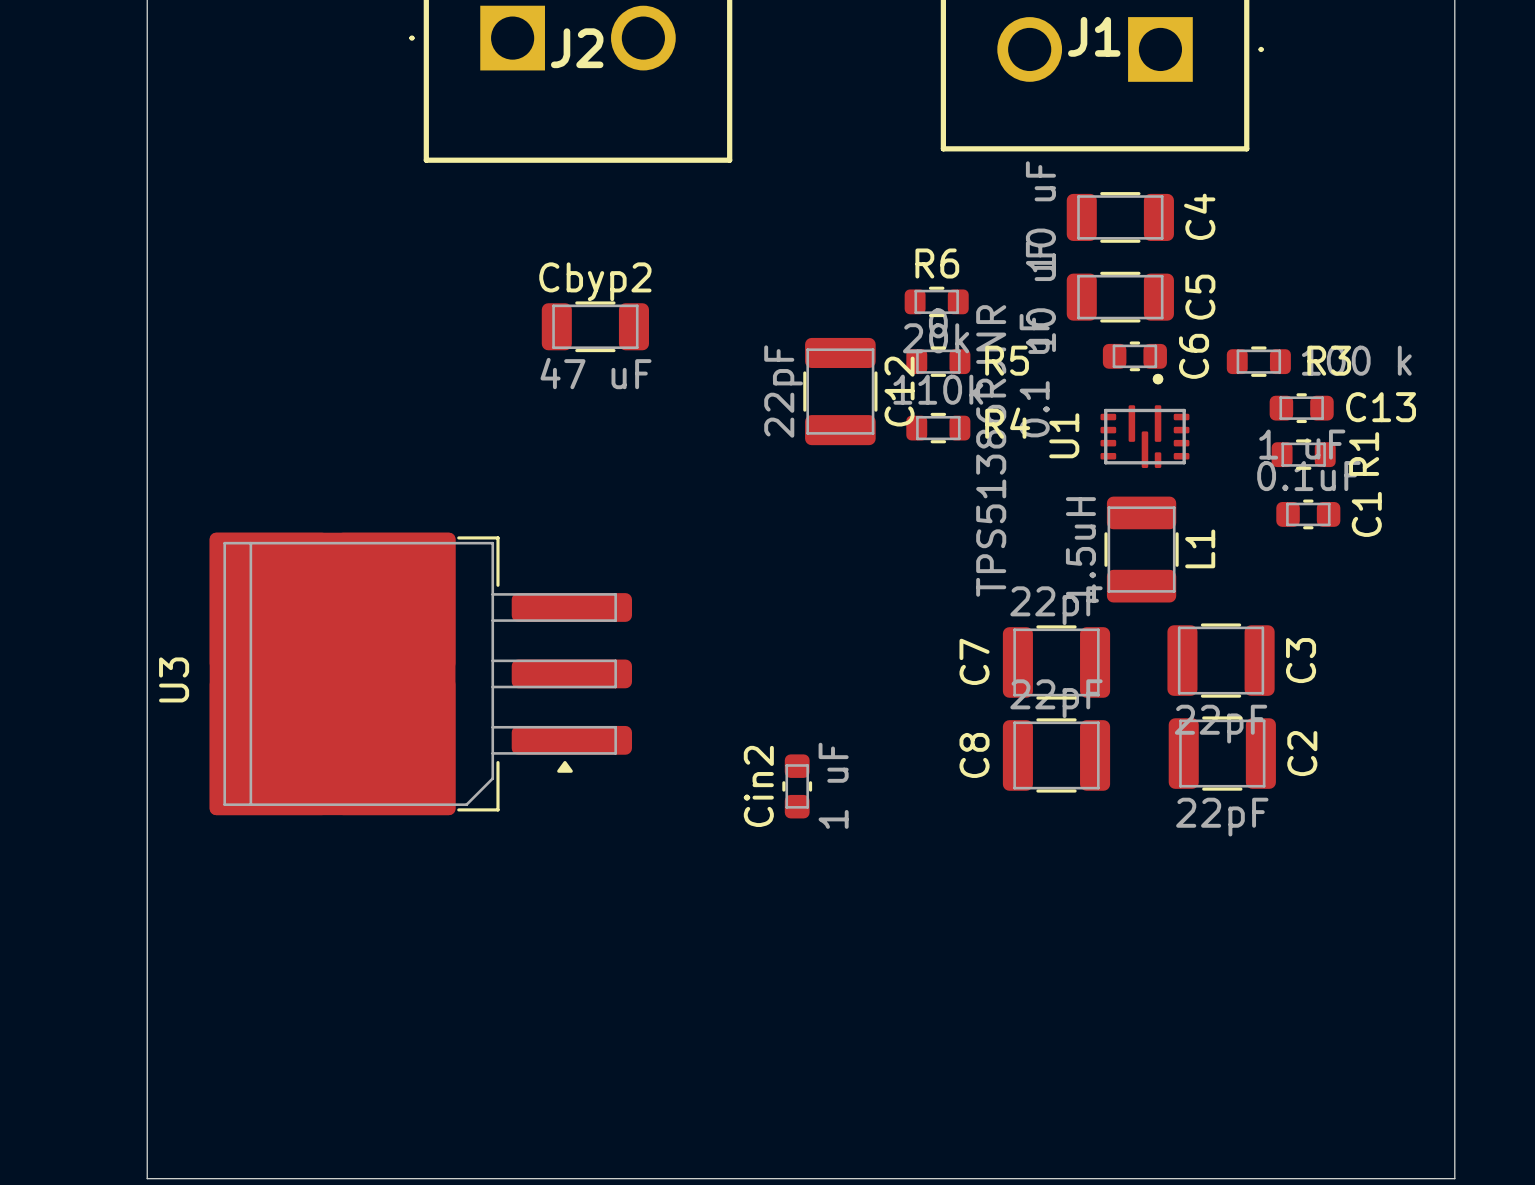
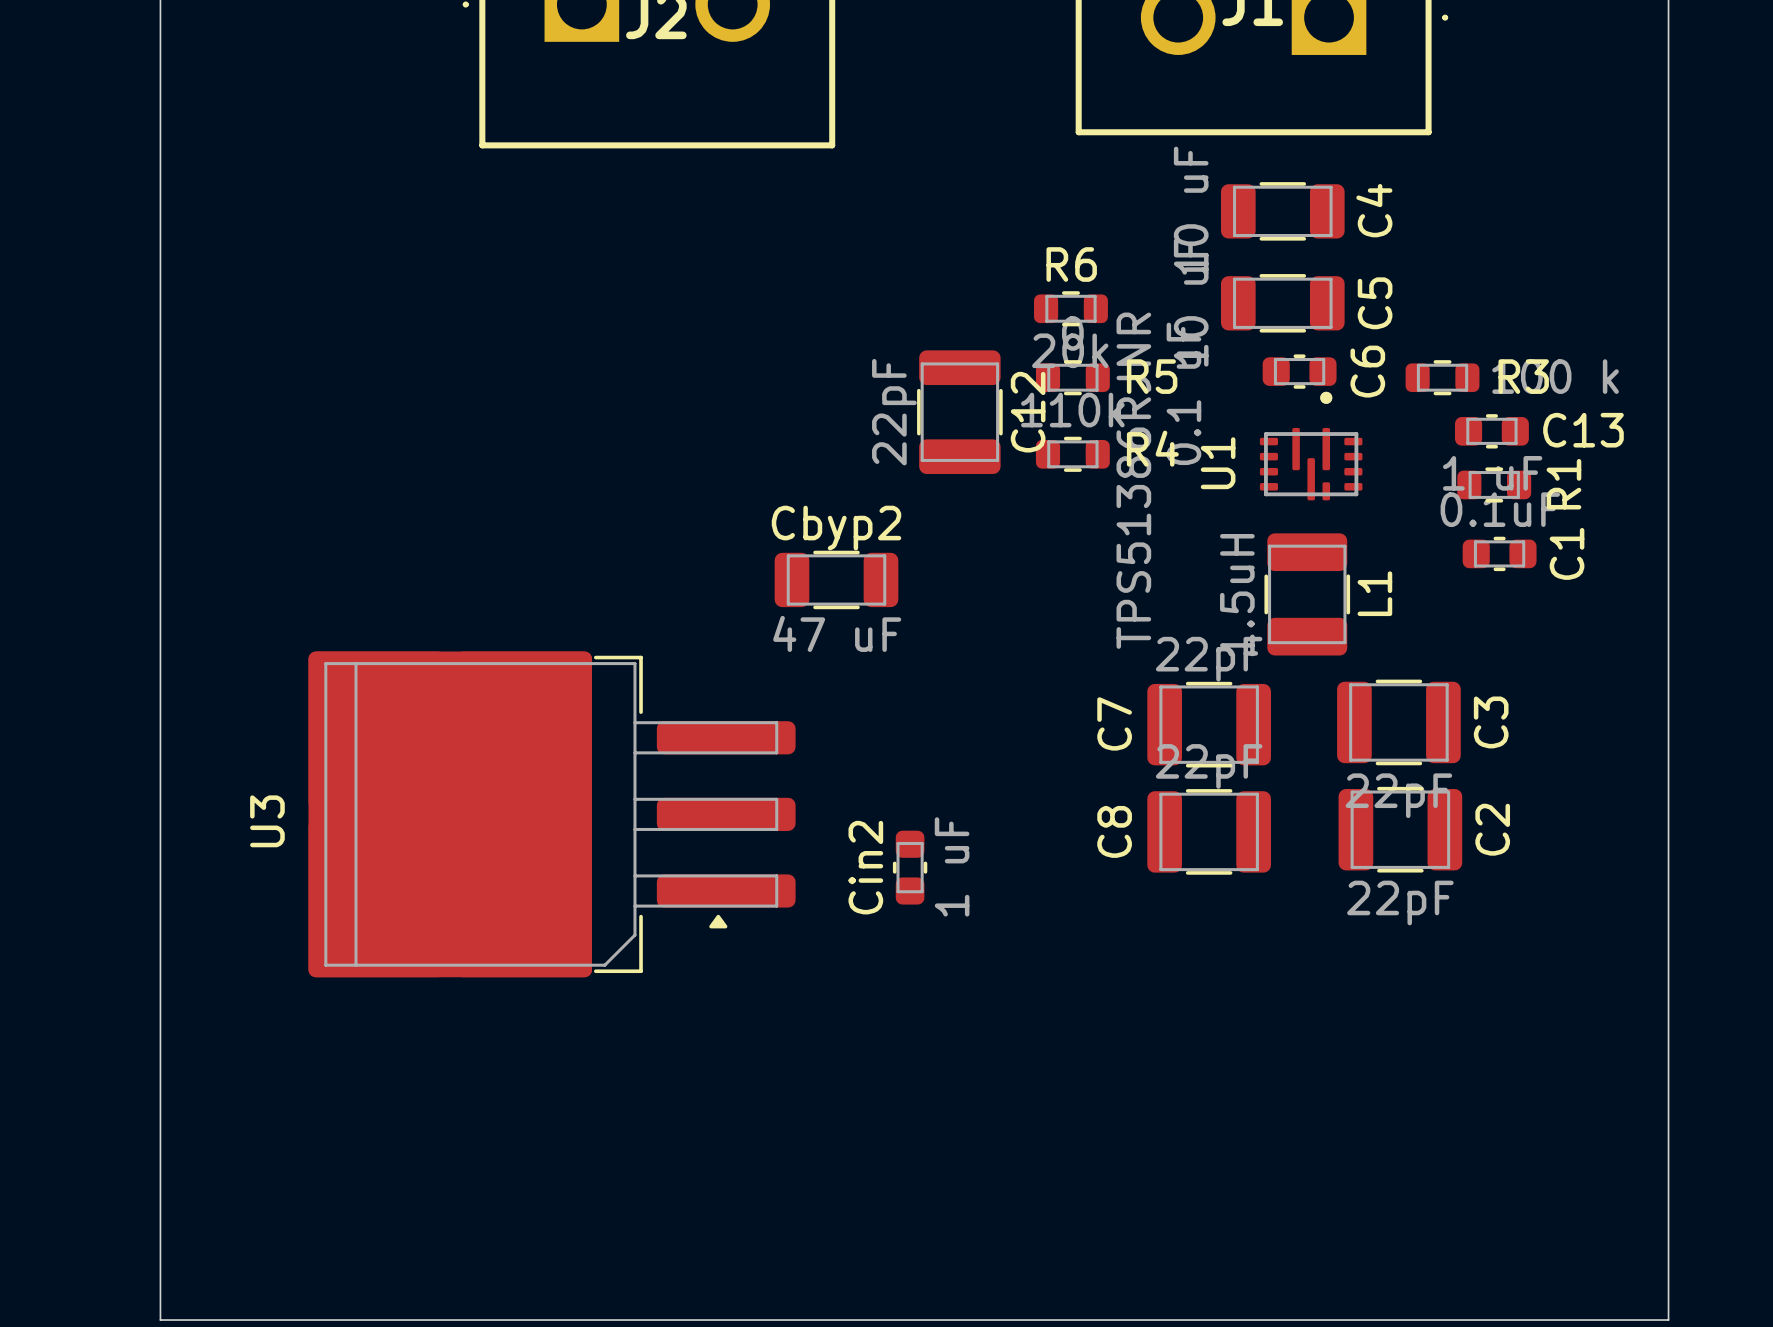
Cbyp2 position: (595, 326) -> (836, 579)
U3 position: (420, 673) -> (552, 814)

